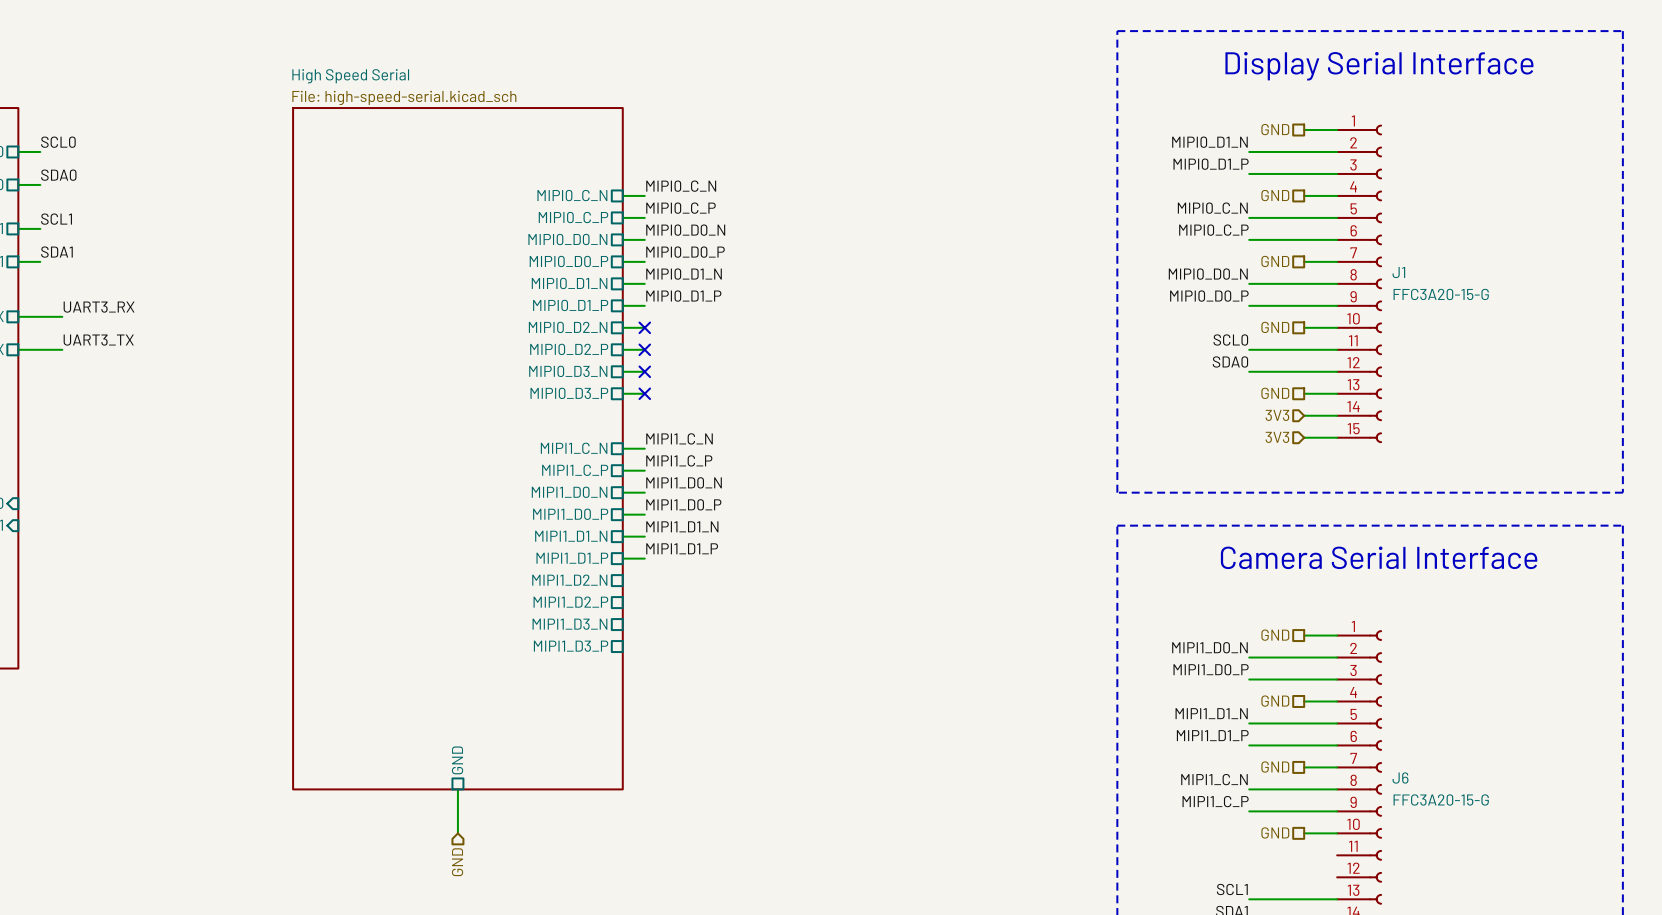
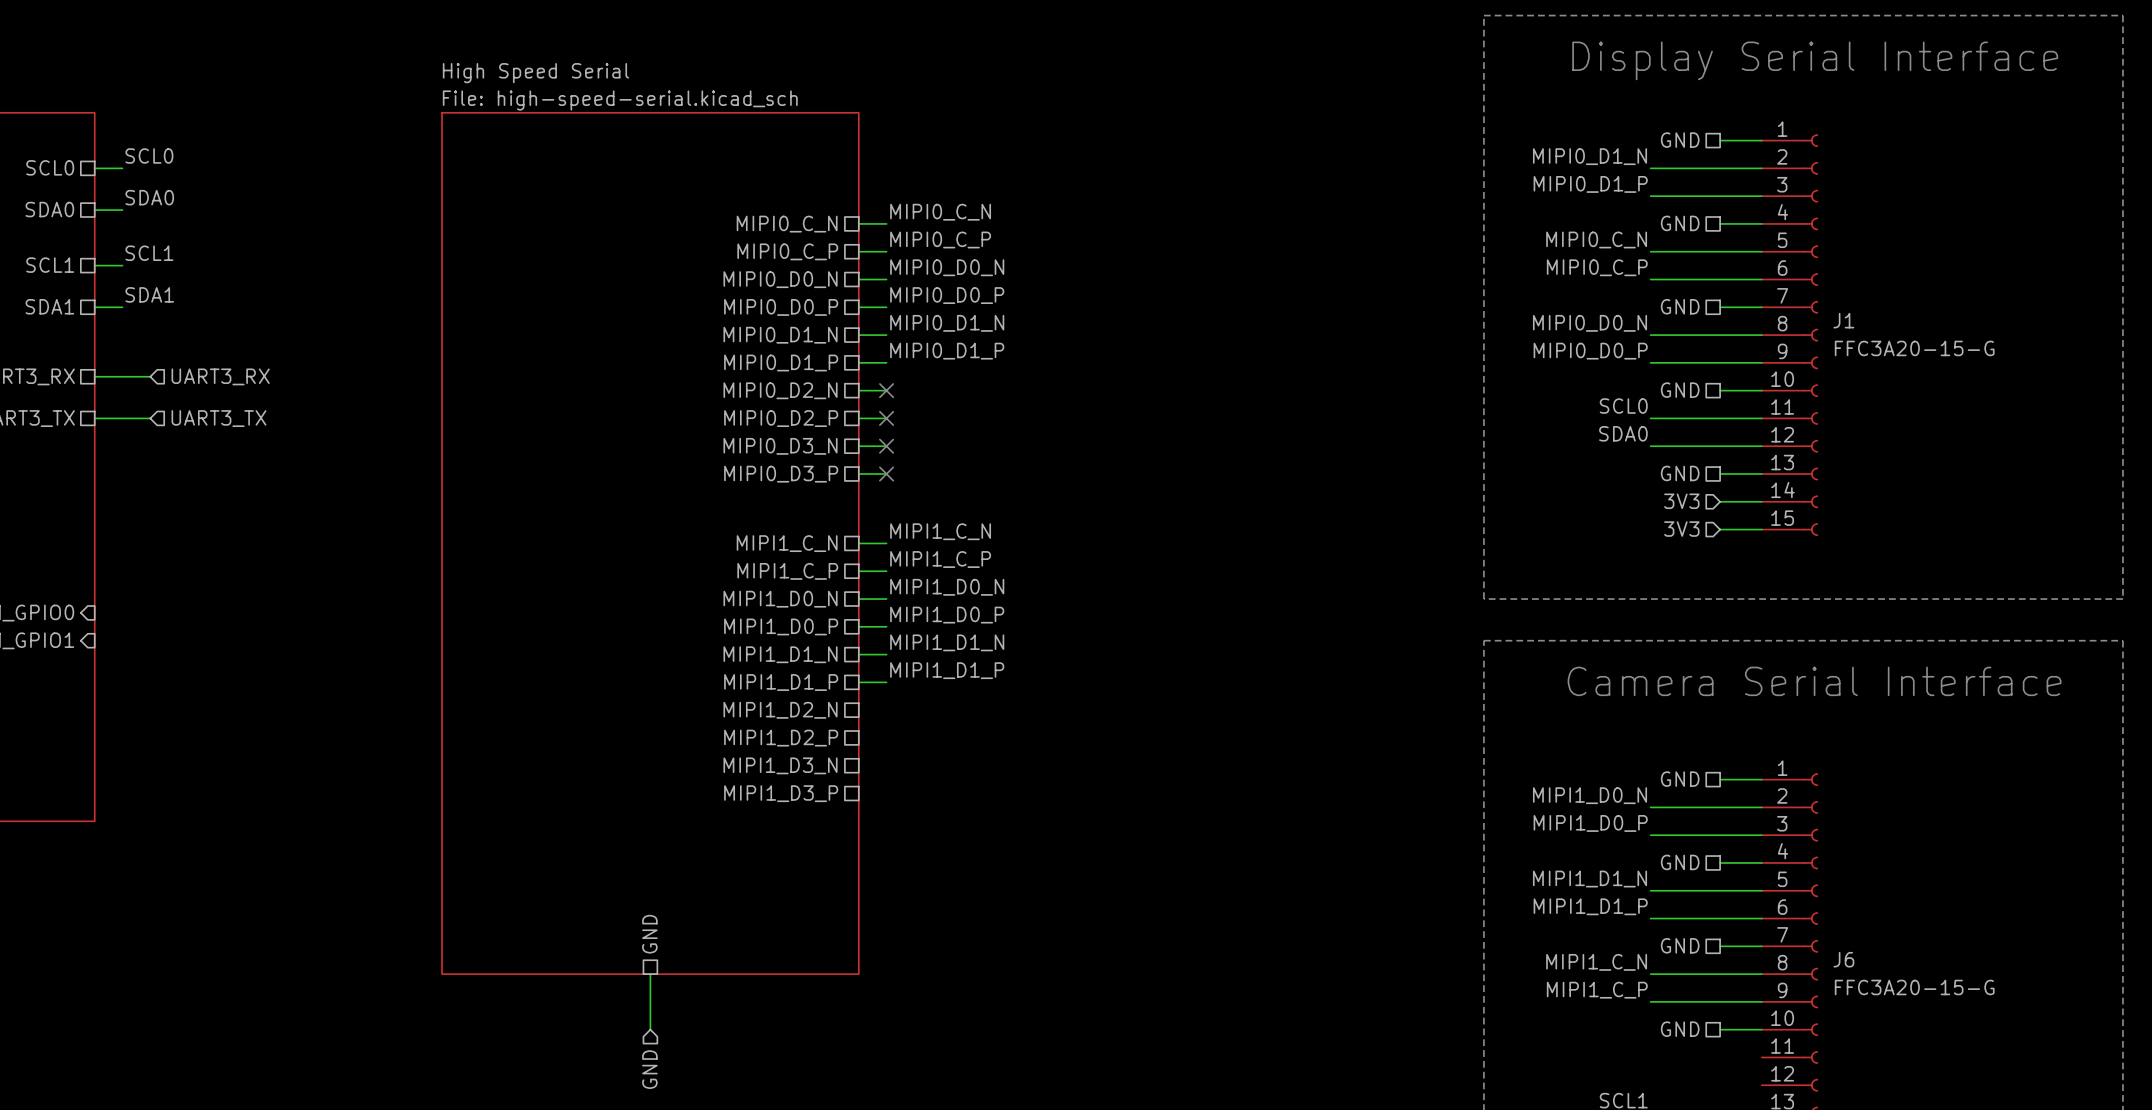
label: UART3_RX (99, 307) -> none
hierarchical label: none -> UART3_RX (220, 376)
label: UART3_TX (98, 340) -> none
hierarchical label: none -> UART3_TX (218, 418)

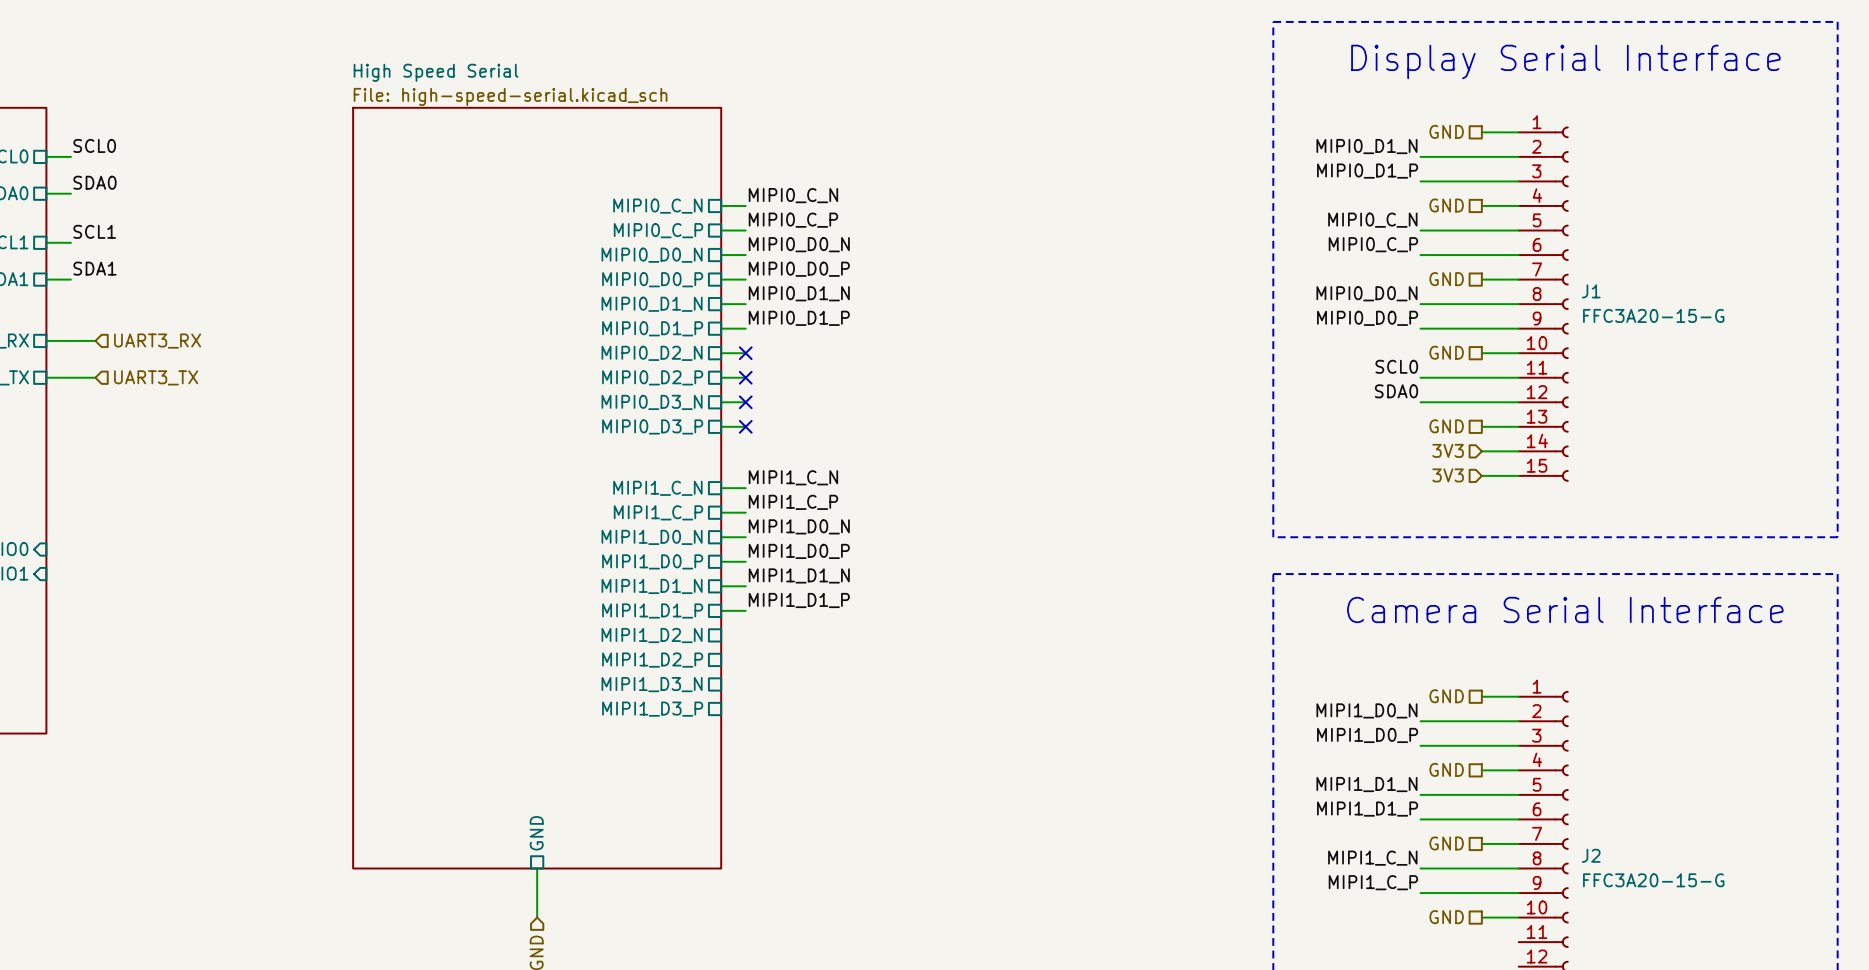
J6 name: J6 (1843, 959) -> J2 (1591, 855)

